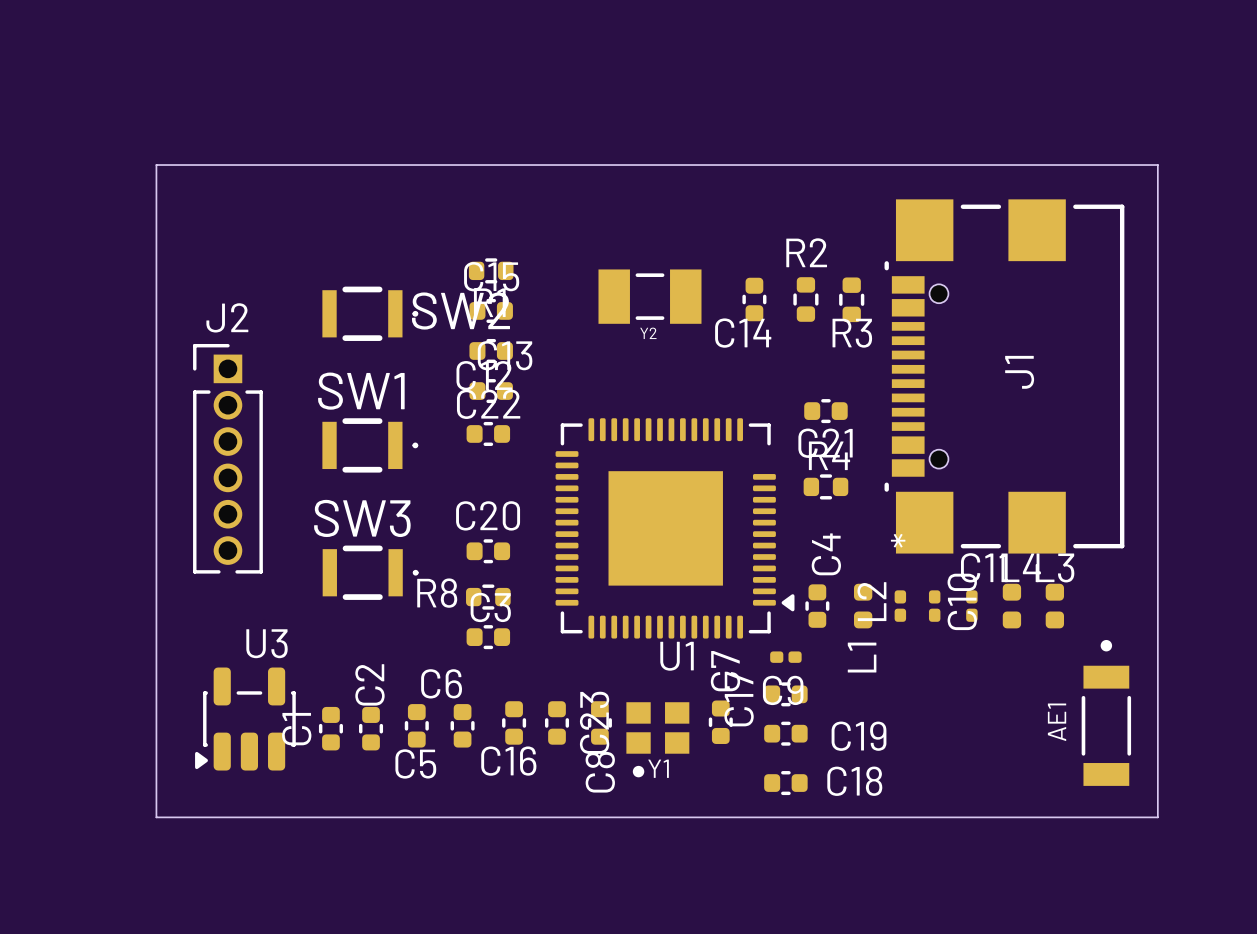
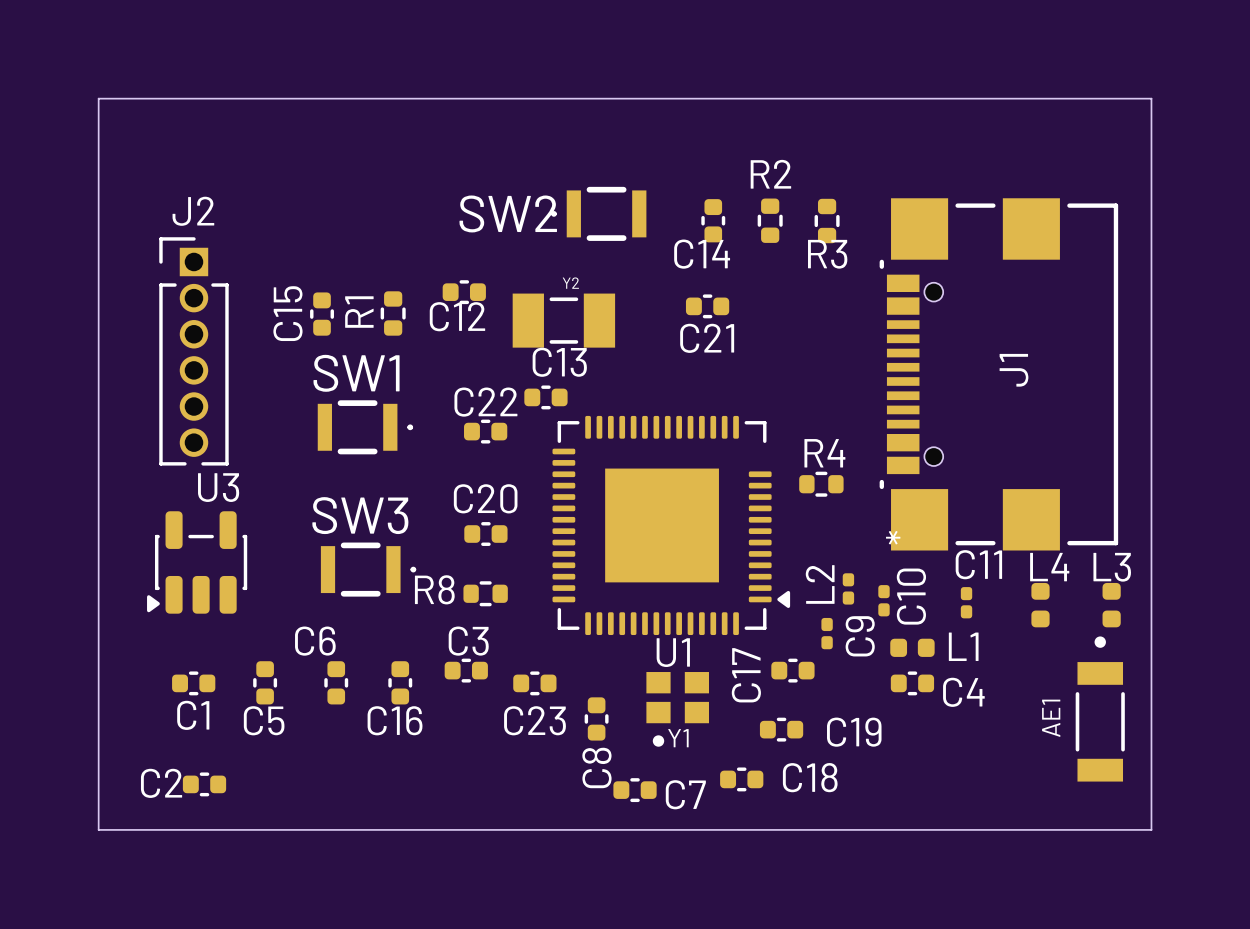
board edge: (1157, 165) (156, 165) (156, 817) (1157, 817) -> (1151, 164) (1151, 98) (98, 98) (98, 829) (1151, 829) (1151, 812)
R1 rotation: 0° (491, 270) -> 90° clockwise (393, 313)
R1 position: (491, 270) -> (393, 313)
Y2 position: (649, 296) -> (563, 320)
C14 position: (754, 299) -> (713, 220)
R2 position: (805, 299) -> (770, 220)
R3 position: (851, 299) -> (827, 221)
C15 rotation: 0° (491, 310) -> 90° clockwise (322, 314)
C15 position: (491, 310) -> (322, 314)
SW2 rotation: 0° (370, 313) -> 180° (598, 213)
SW2 position: (370, 313) -> (598, 213)
Y2 name position: Y2 (648, 333) -> Y2 (570, 283)
C12 position: (491, 350) -> (464, 292)
C13 position: (491, 391) -> (545, 397)
C21 position: (825, 411) -> (707, 306)
SW1 position: (370, 445) -> (365, 427)
J2 position: (227, 458) -> (193, 351)
C20 position: (488, 551) -> (485, 534)
C4 rotation: 0° (817, 606) -> 90° clockwise (912, 683)
C4 position: (817, 606) -> (912, 683)
L1 rotation: 0° (863, 606) -> 90° clockwise (912, 647)
L1 position: (863, 606) -> (912, 647)
L2 position: (900, 606) -> (848, 588)
C10 position: (934, 606) -> (884, 600)
L4 position: (1011, 606) -> (1040, 605)
L3 position: (1054, 606) -> (1111, 605)
C3 position: (488, 637) -> (466, 670)
C9 rotation: 0° (785, 657) -> 90° clockwise (827, 633)
C9 position: (785, 657) -> (827, 633)
L1 name position: L1 (862, 657) -> L1 (963, 646)
C2 name position: C2 (369, 684) -> C2 (161, 783)
C17 position: (785, 694) -> (792, 670)
U3 position: (245, 719) -> (197, 562)
C16 position: (514, 722) -> (400, 682)
C23 rotation: 0° (557, 722) -> 90° clockwise (534, 683)
C23 position: (557, 722) -> (534, 683)
C7 rotation: 0° (720, 722) -> 90° clockwise (635, 790)
C7 position: (720, 722) -> (635, 790)
C5 position: (416, 725) -> (265, 682)
C6 position: (462, 725) -> (336, 682)
C1 rotation: 0° (330, 728) -> 90° clockwise (193, 683)
C1 position: (330, 728) -> (193, 683)
C2 rotation: 0° (371, 728) -> 90° clockwise (204, 784)
C2 position: (371, 728) -> (204, 784)
Y1 position: (657, 739) -> (677, 709)
C18 position: (785, 783) -> (741, 779)

